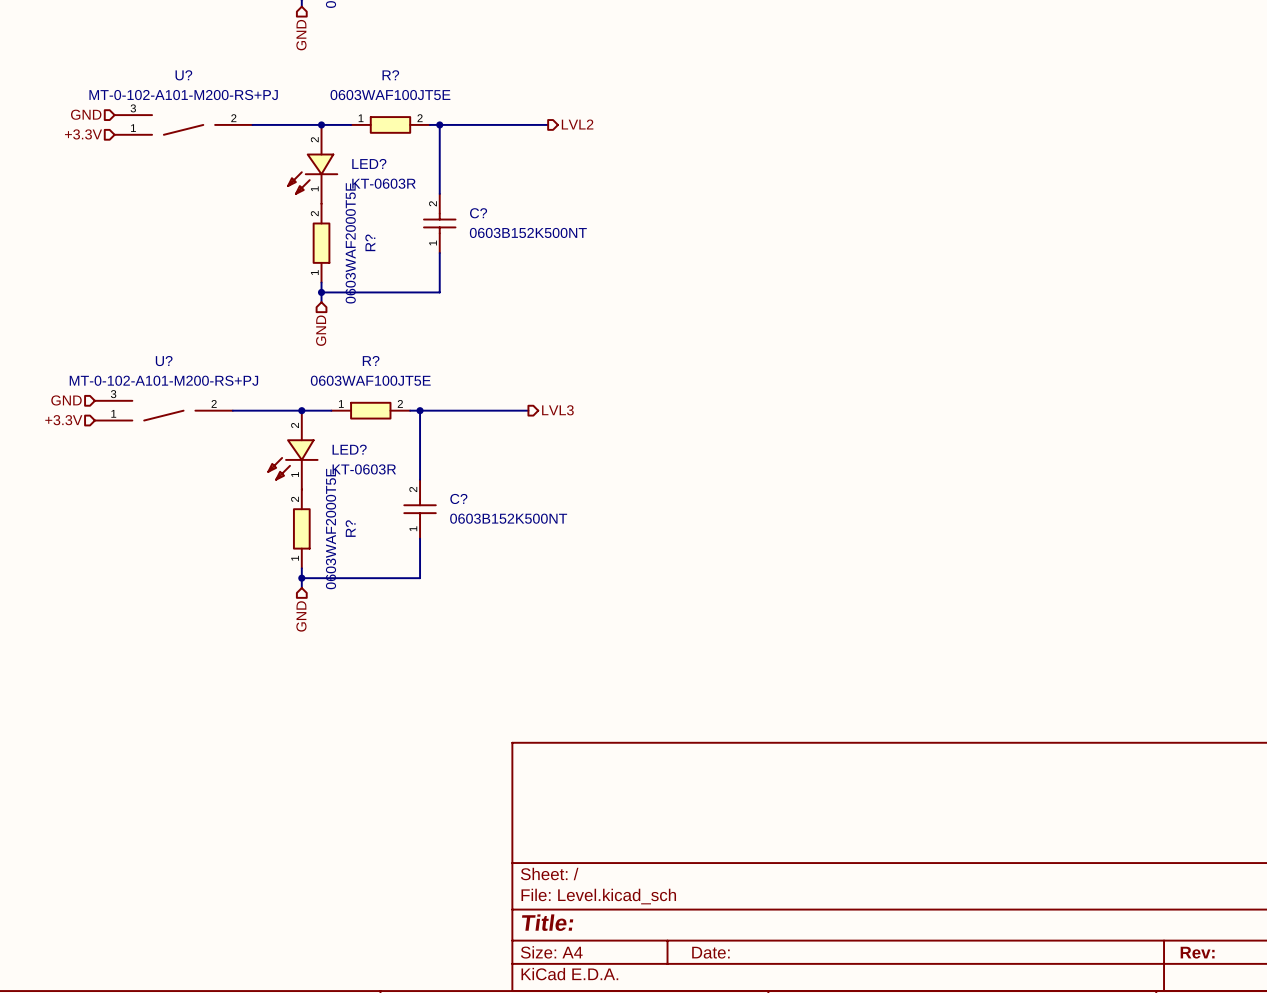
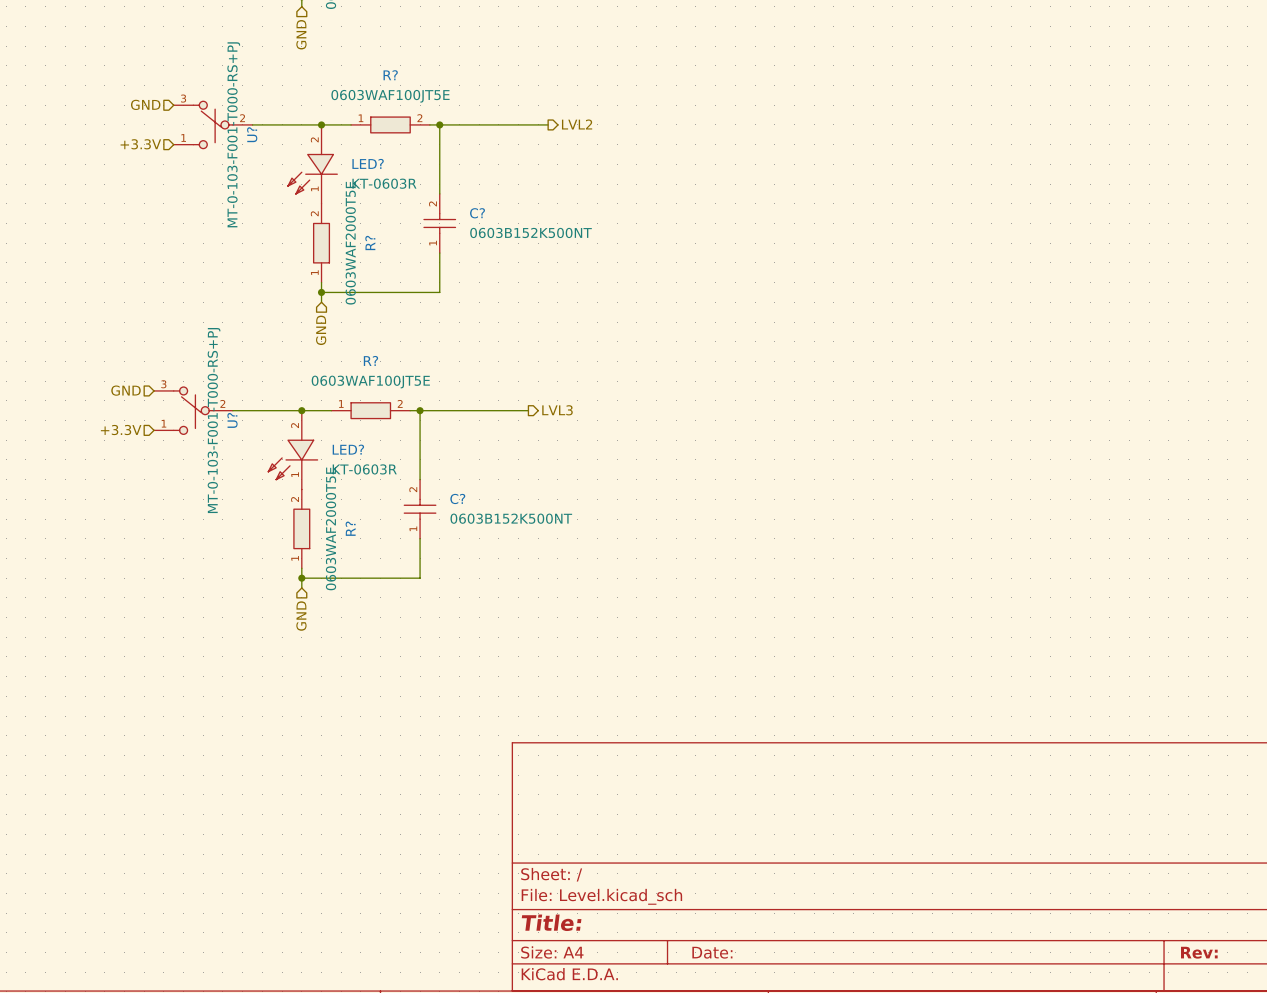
hierarchical label position: GND (86, 114) -> GND (145, 104)
U?: MT-0-102-A101-M200-RS+PJ (183, 124) -> none
U?: none -> MT-0-103-F001-T000-RS+PJ (213, 124)
hierarchical label position: +3.3V (83, 134) -> +3.3V (140, 144)
hierarchical label position: GND (66, 400) -> GND (126, 390)
U?: MT-0-102-A101-M200-RS+PJ (163, 410) -> none
U?: none -> MT-0-103-F001-T000-RS+PJ (193, 410)
hierarchical label position: +3.3V (63, 420) -> +3.3V (121, 430)

